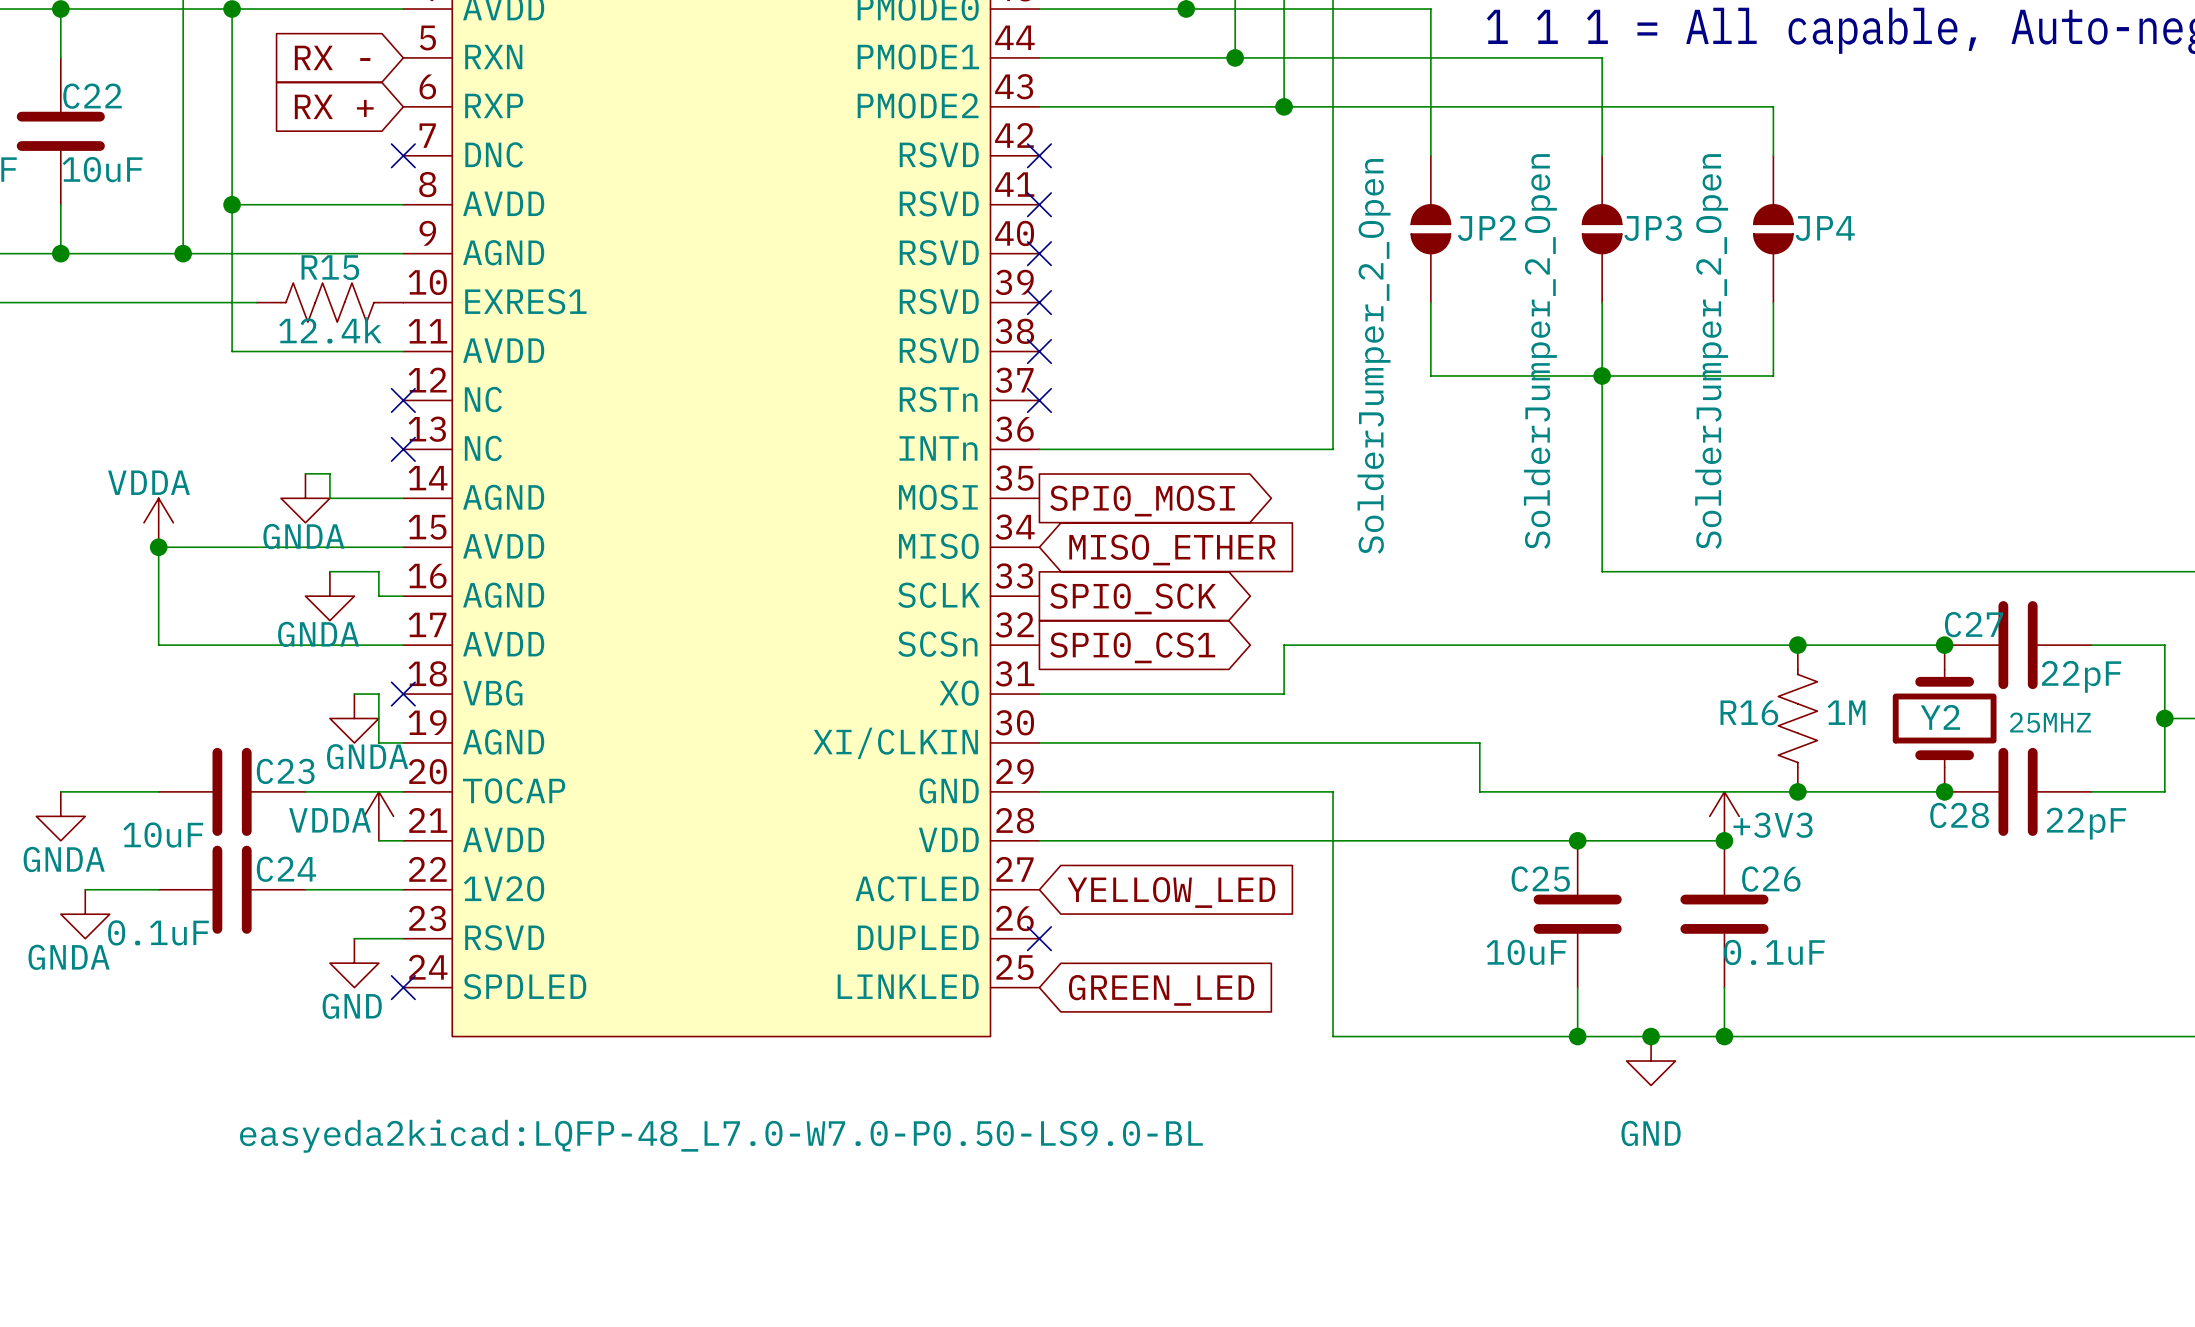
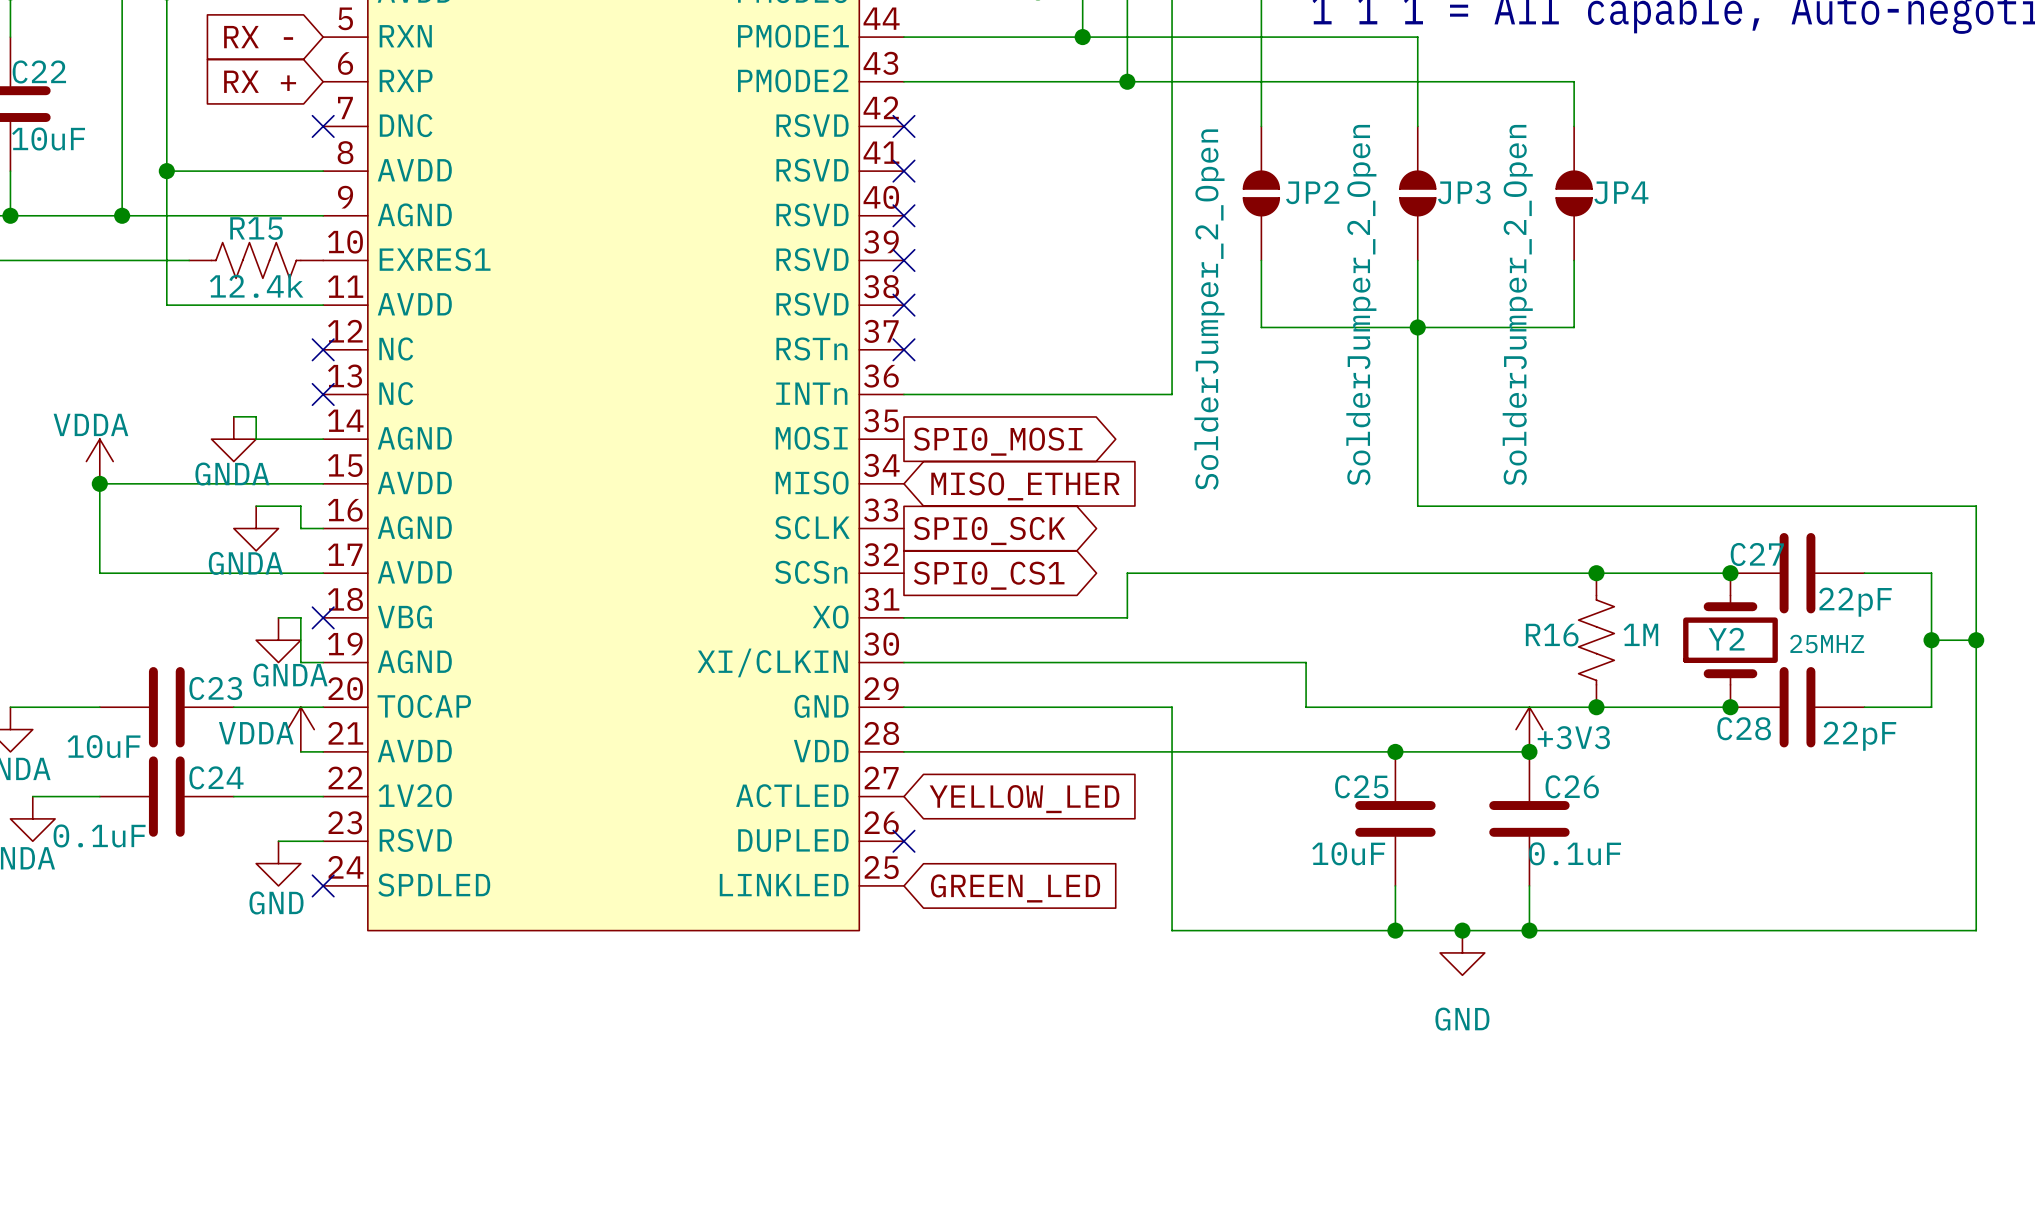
part text: easyeda2kicad:LQFP-48_L7.0-W7.0-P0.50-LS9.0-BL (721, 1136) -> none

